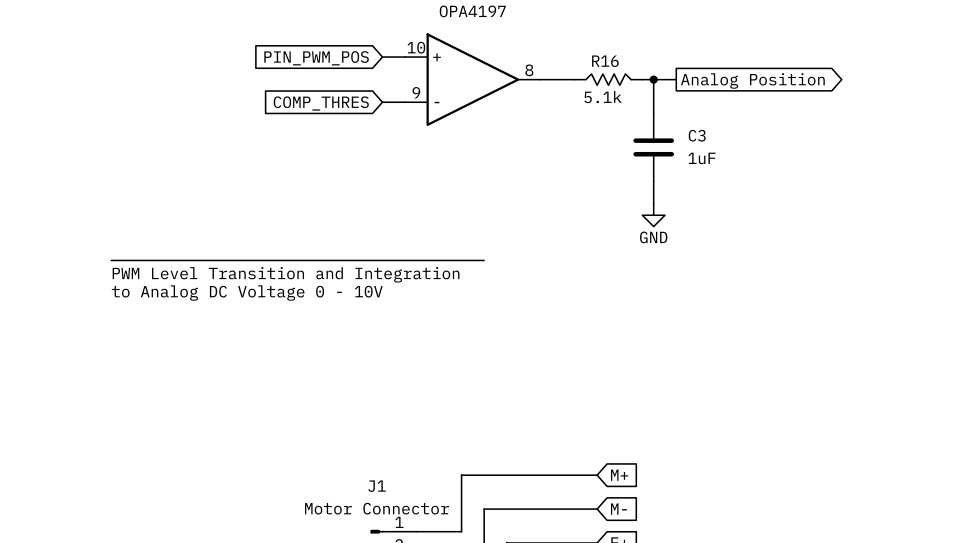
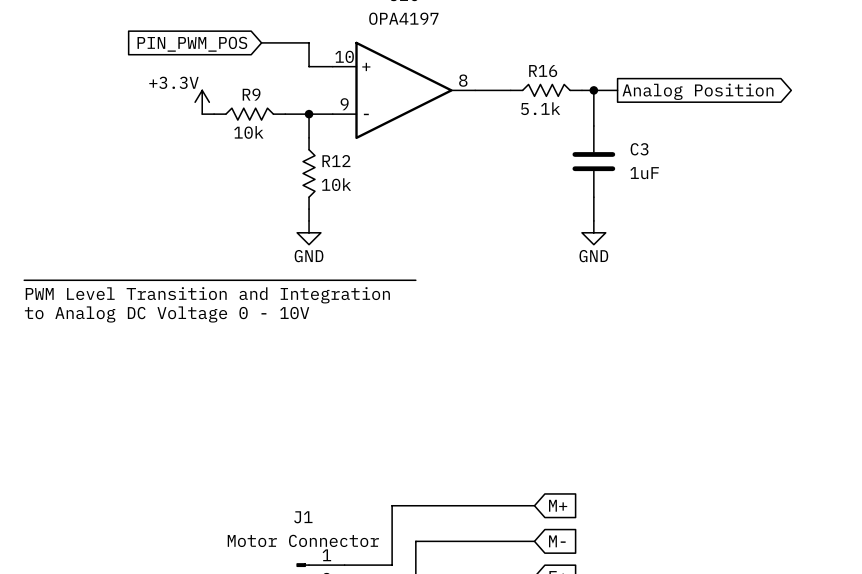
wire: none -> (261, 42) (309, 42) (309, 66)
global label position: PIN_PWM_POS (316, 58) -> PIN_PWM_POS (192, 44)
power symbol: none -> +3.3V (202, 102)
wire: none -> (202, 114) (214, 114)
R9: none -> 10k (249, 114)
wire: none -> (285, 114) (309, 114) (309, 137)
junction: none -> (309, 114)
global label: COMP_THRES (321, 103) -> none
R12: none -> 10k (309, 173)
wire: none -> (309, 209) (309, 220)
power symbol: none -> GND (309, 232)

